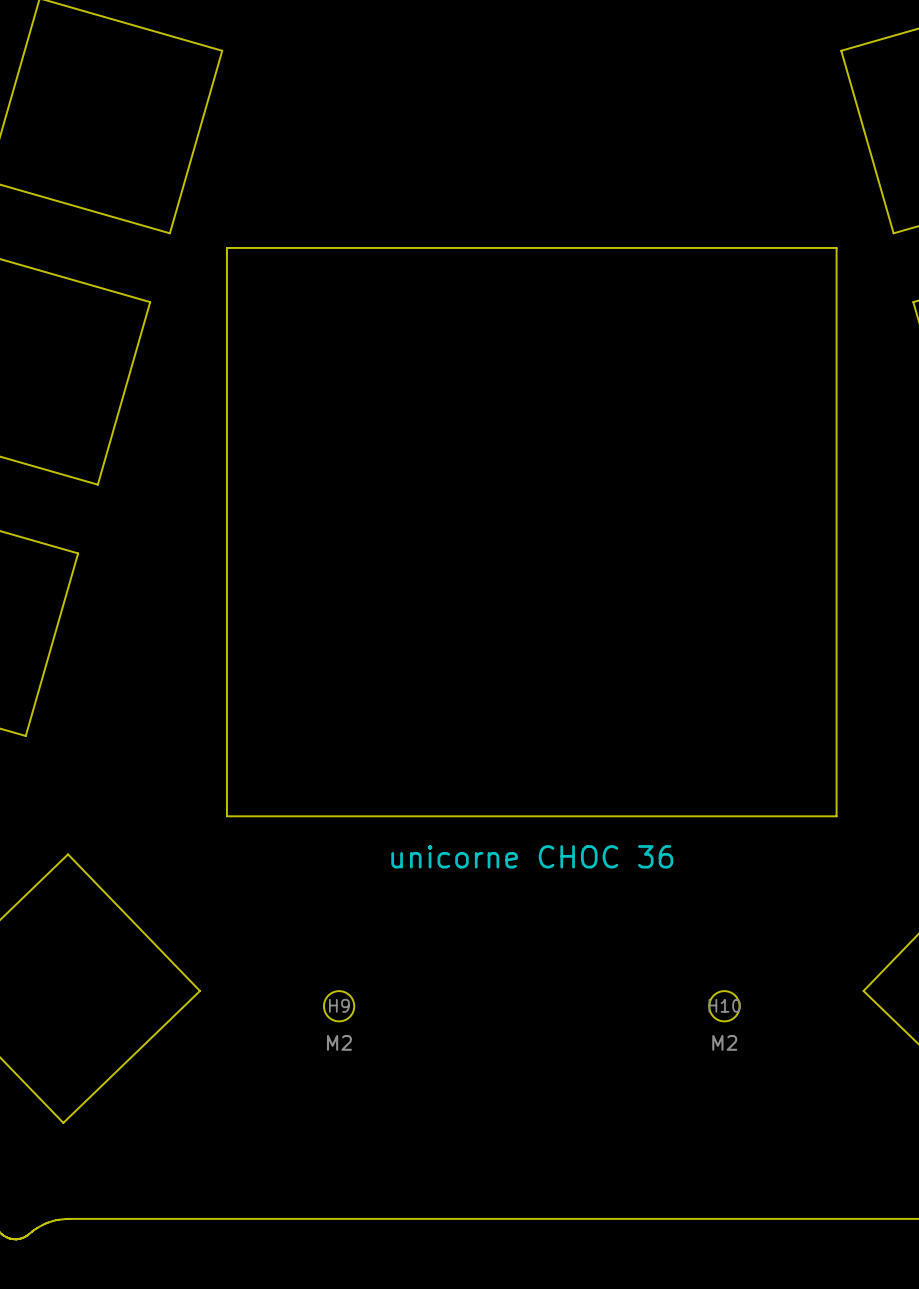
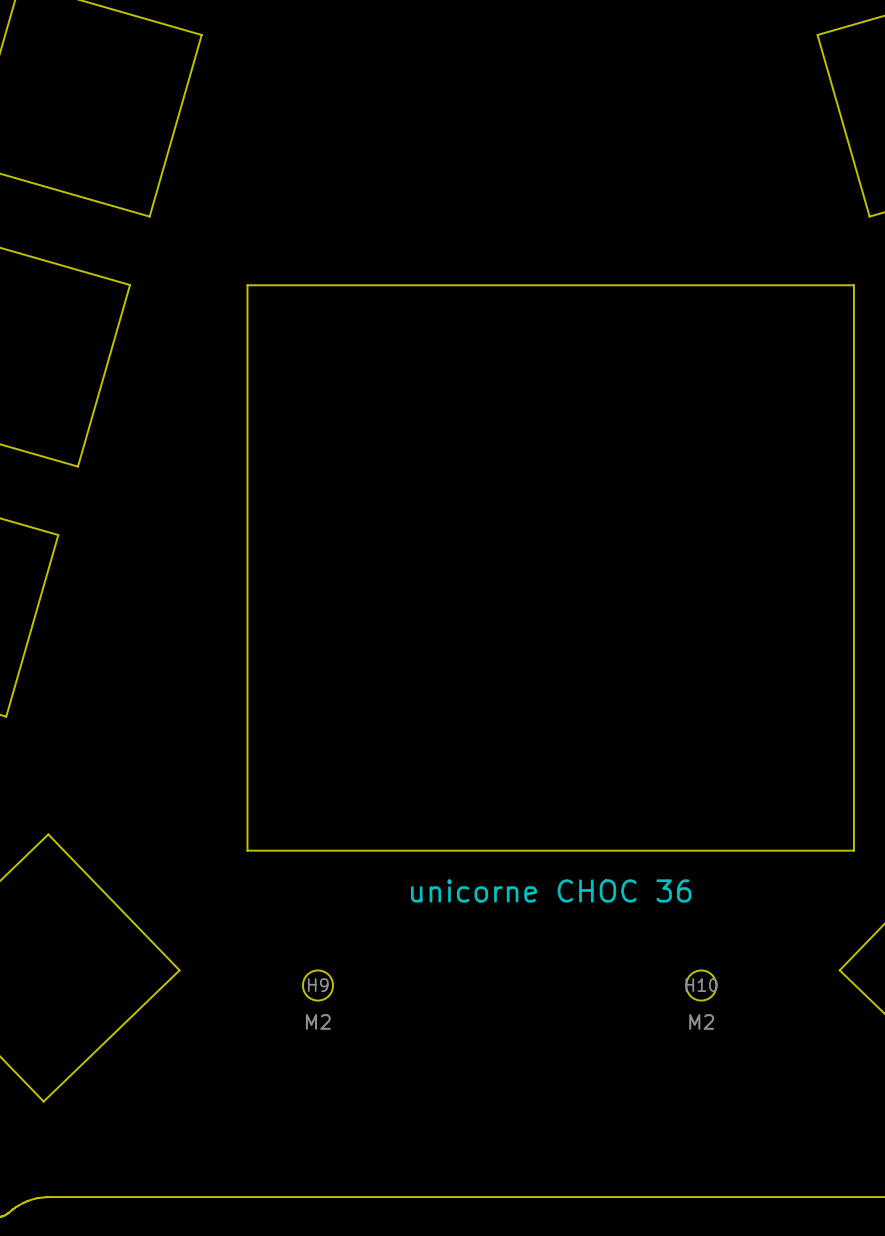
board edge: (226, 247) (836, 247) (836, 816) (226, 816) (226, 247) -> (247, 285) (853, 285) (853, 850) (247, 850) (247, 285)
text position: unicorne CHOC 36 (532, 856) -> unicorne CHOC 36 (551, 890)

